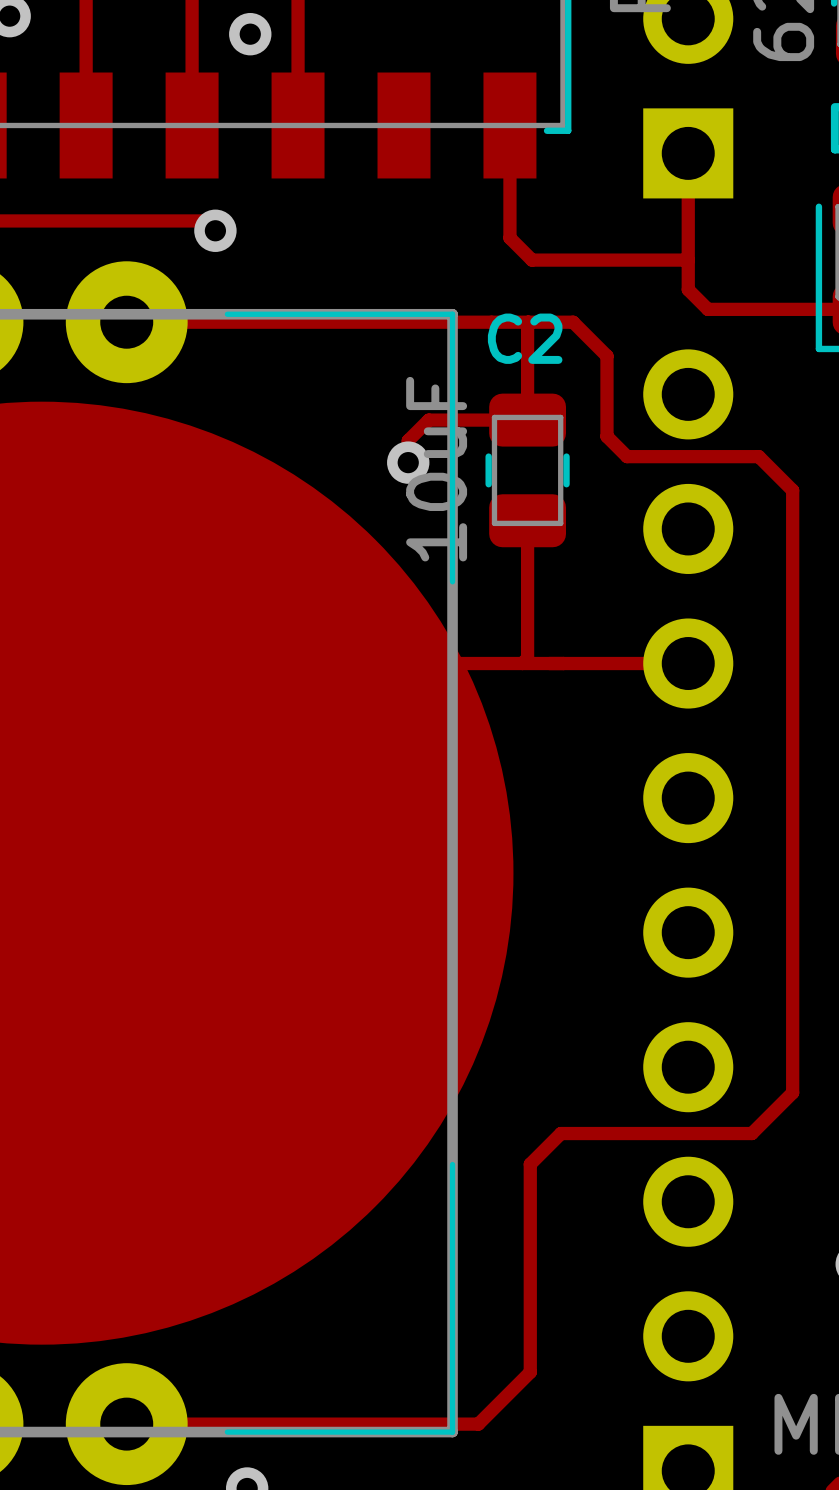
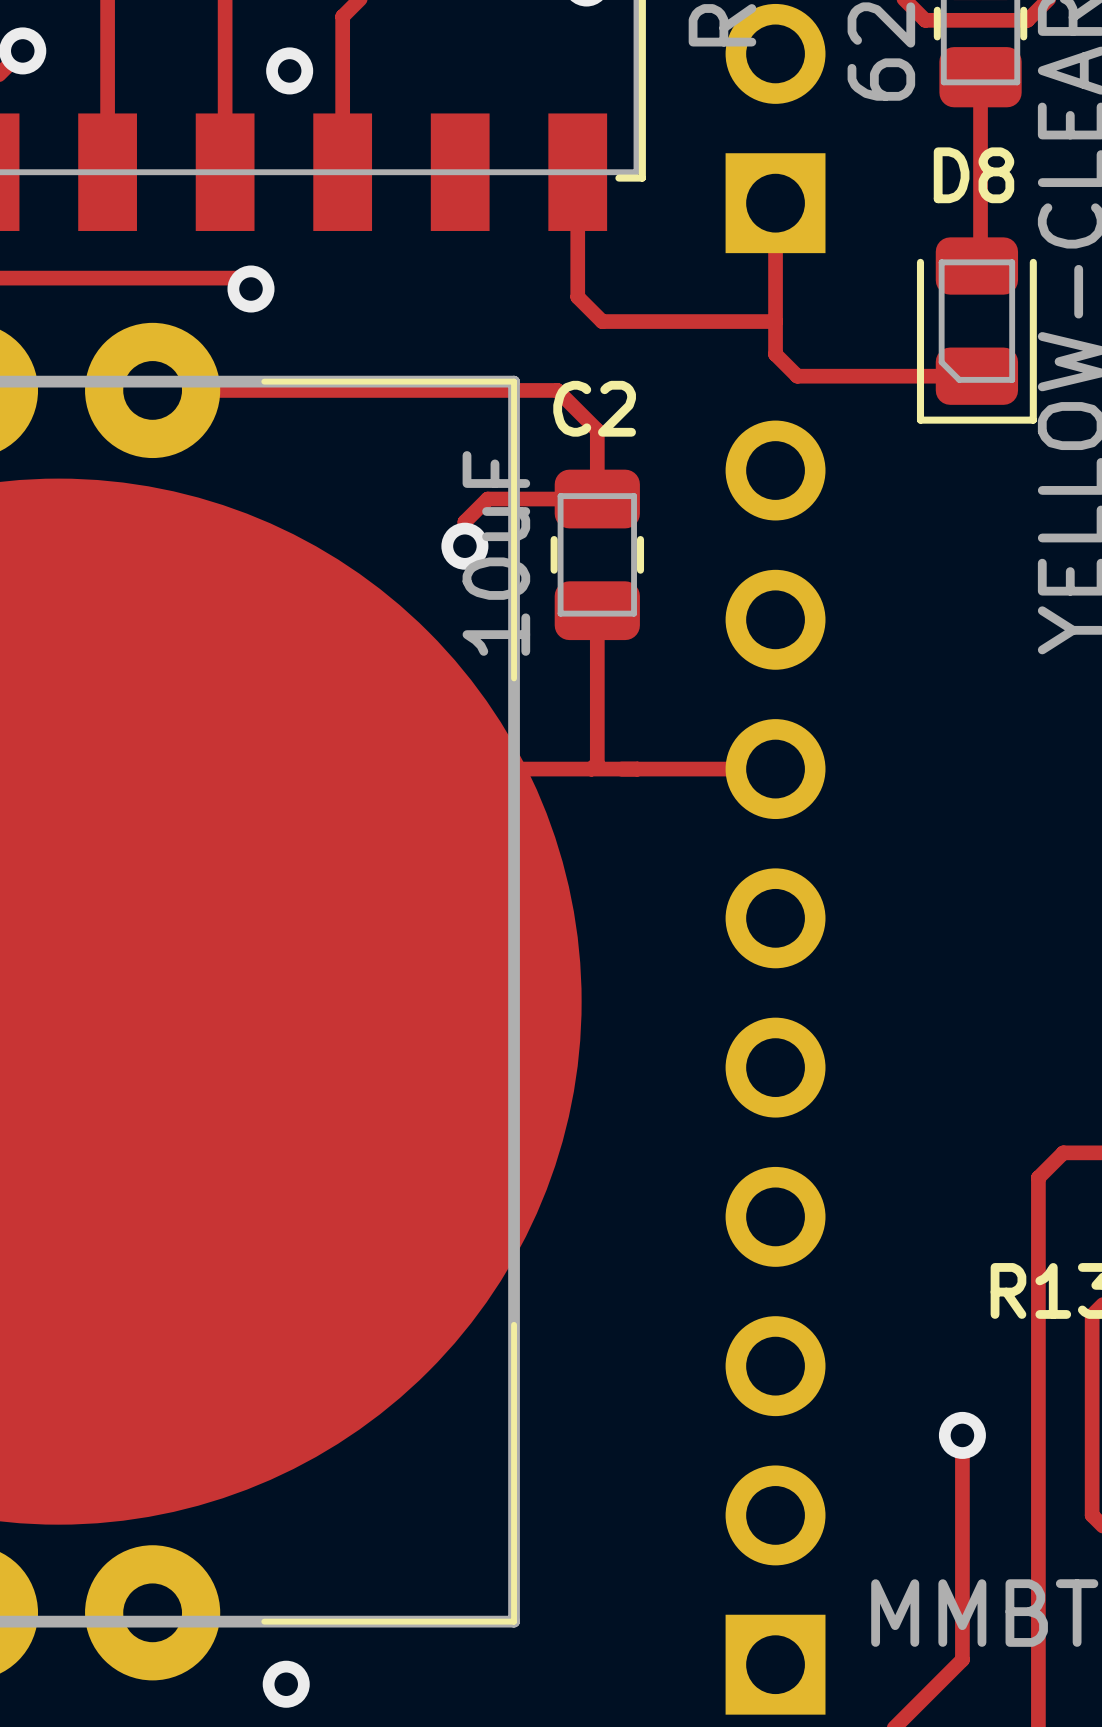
track: (491, 322) (573, 322) (606, 356) (606, 436) (627, 456) (758, 456) (792, 490) (792, 1092) (751, 1133) (560, 1133) (530, 1164) (530, 1372) (478, 1424) (126, 1424) -> none
track: (527, 322) (527, 358) -> (557, 390) (597, 430)

